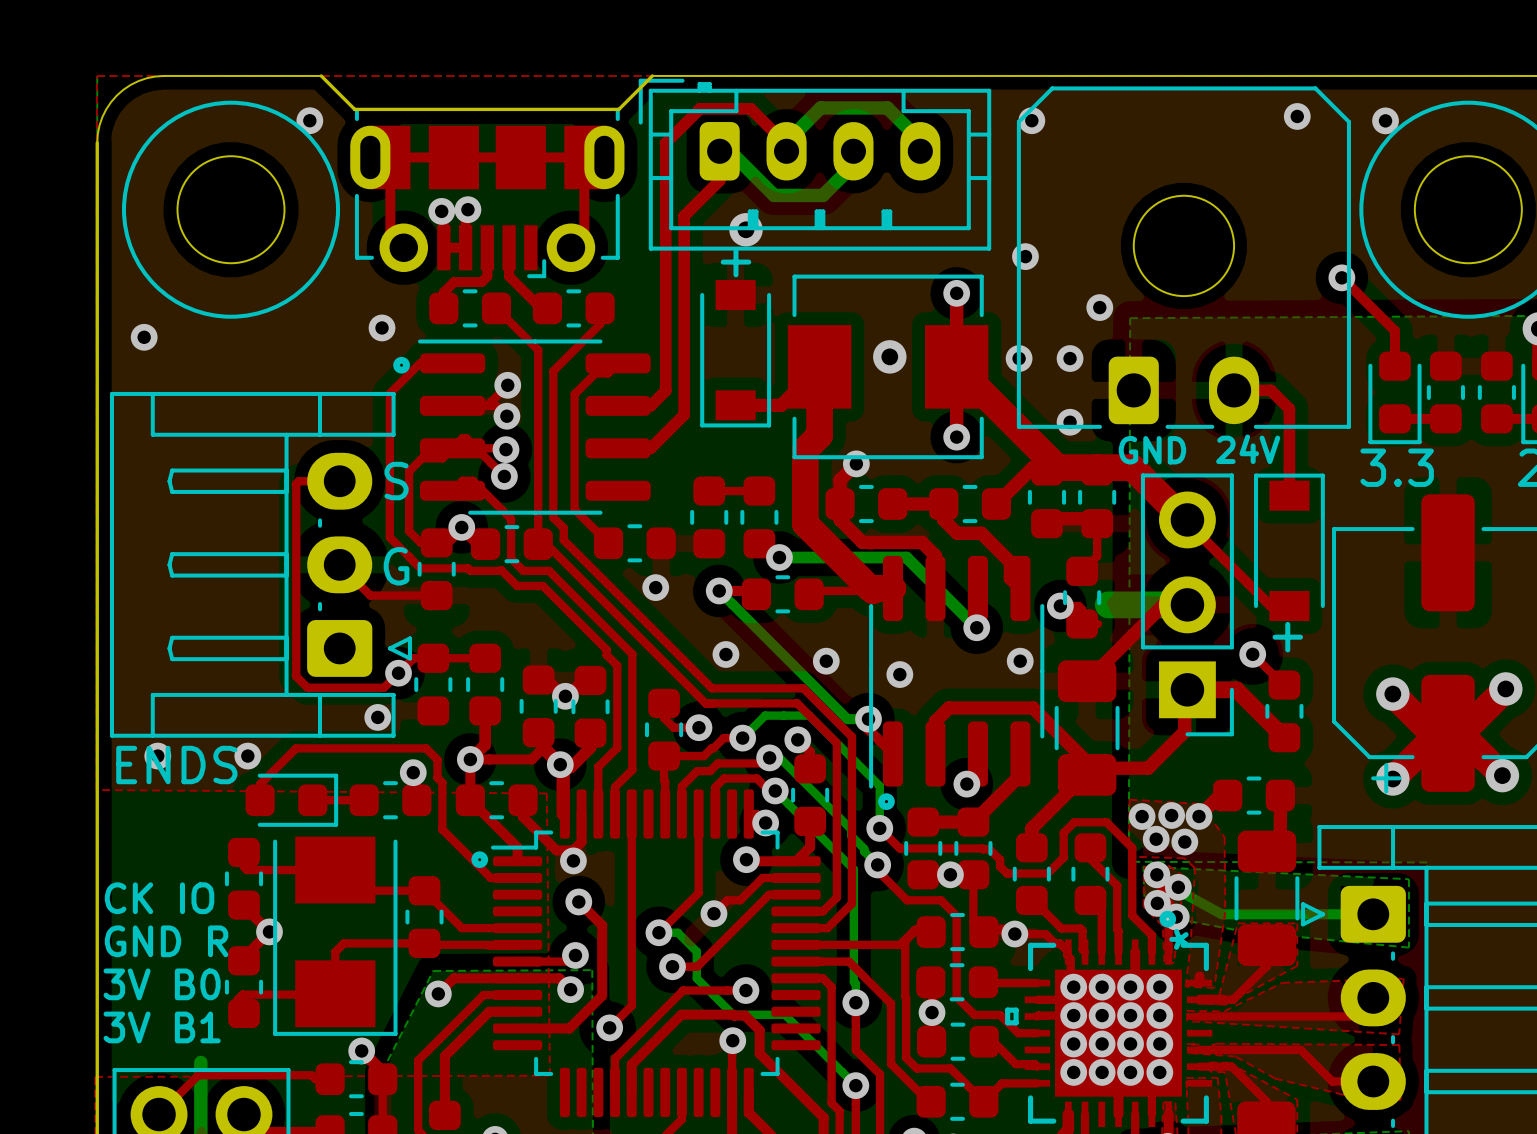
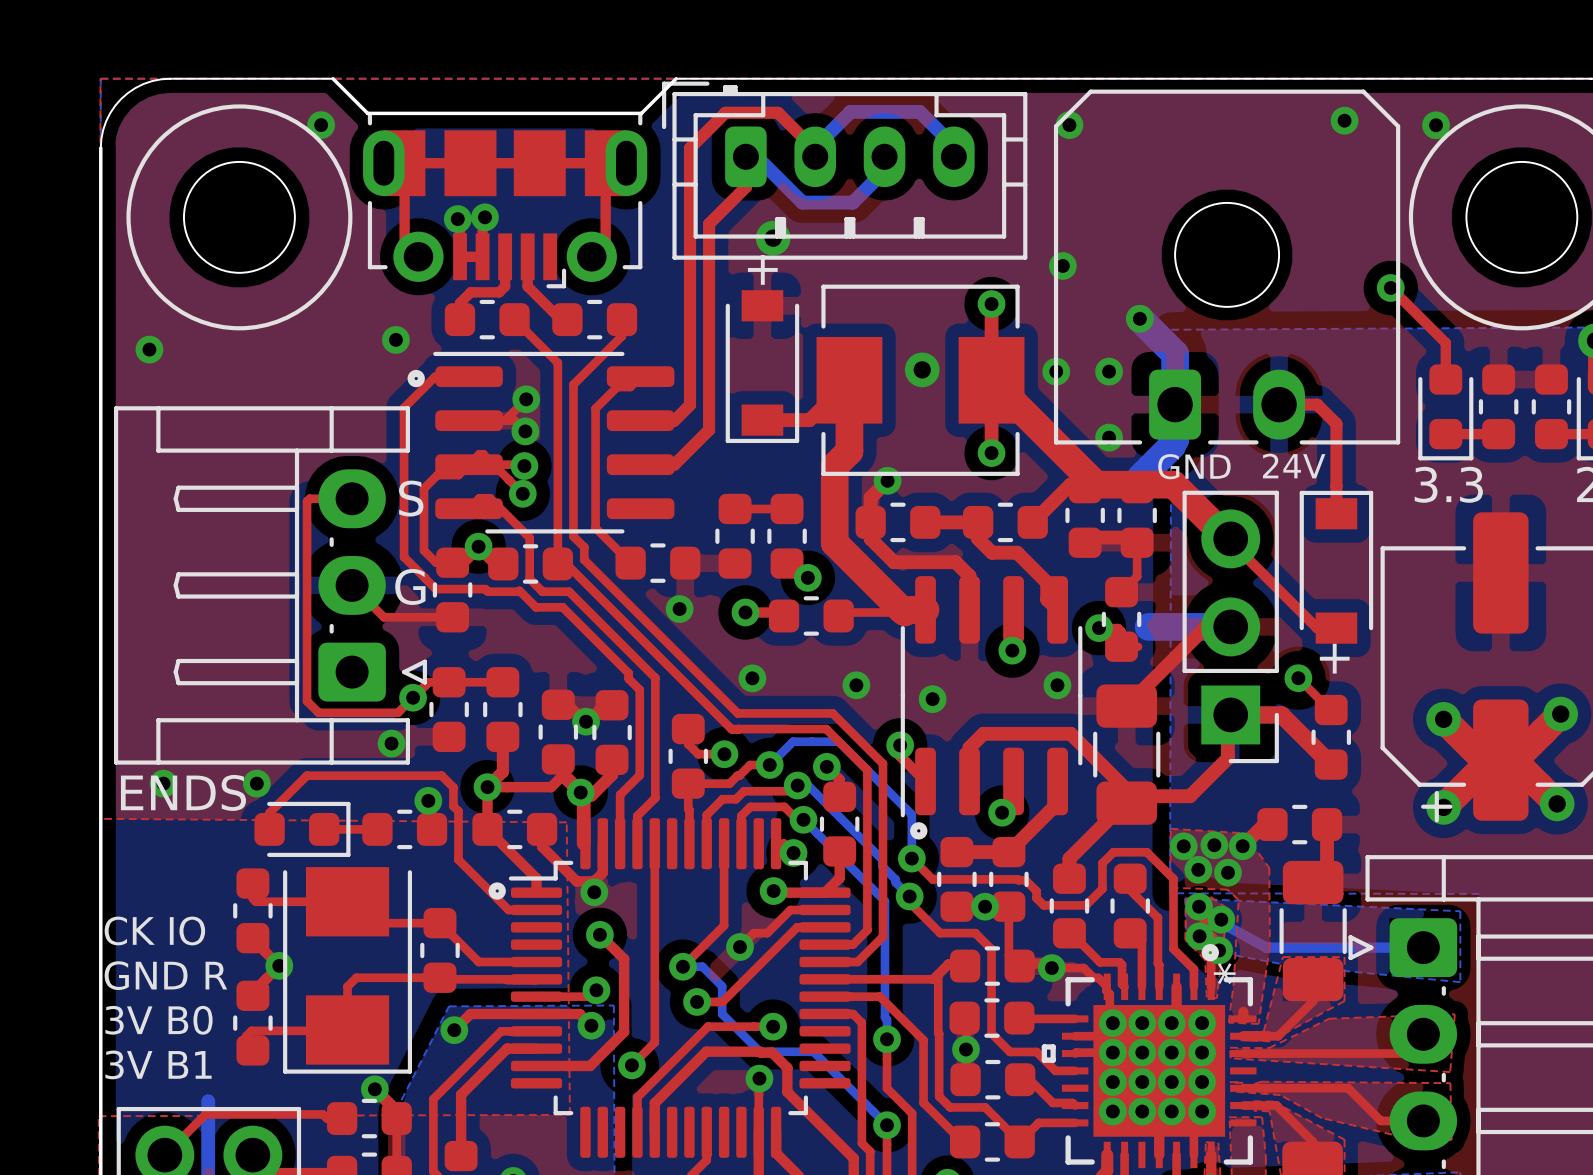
bottom track: none -> (1139, 318) (1175, 354) (1175, 439) (1172, 445) (1140, 477)
bottom track: (779, 557) (906, 557) (976, 627) -> none
bottom track: (719, 590) (847, 719) (868, 719) -> none

